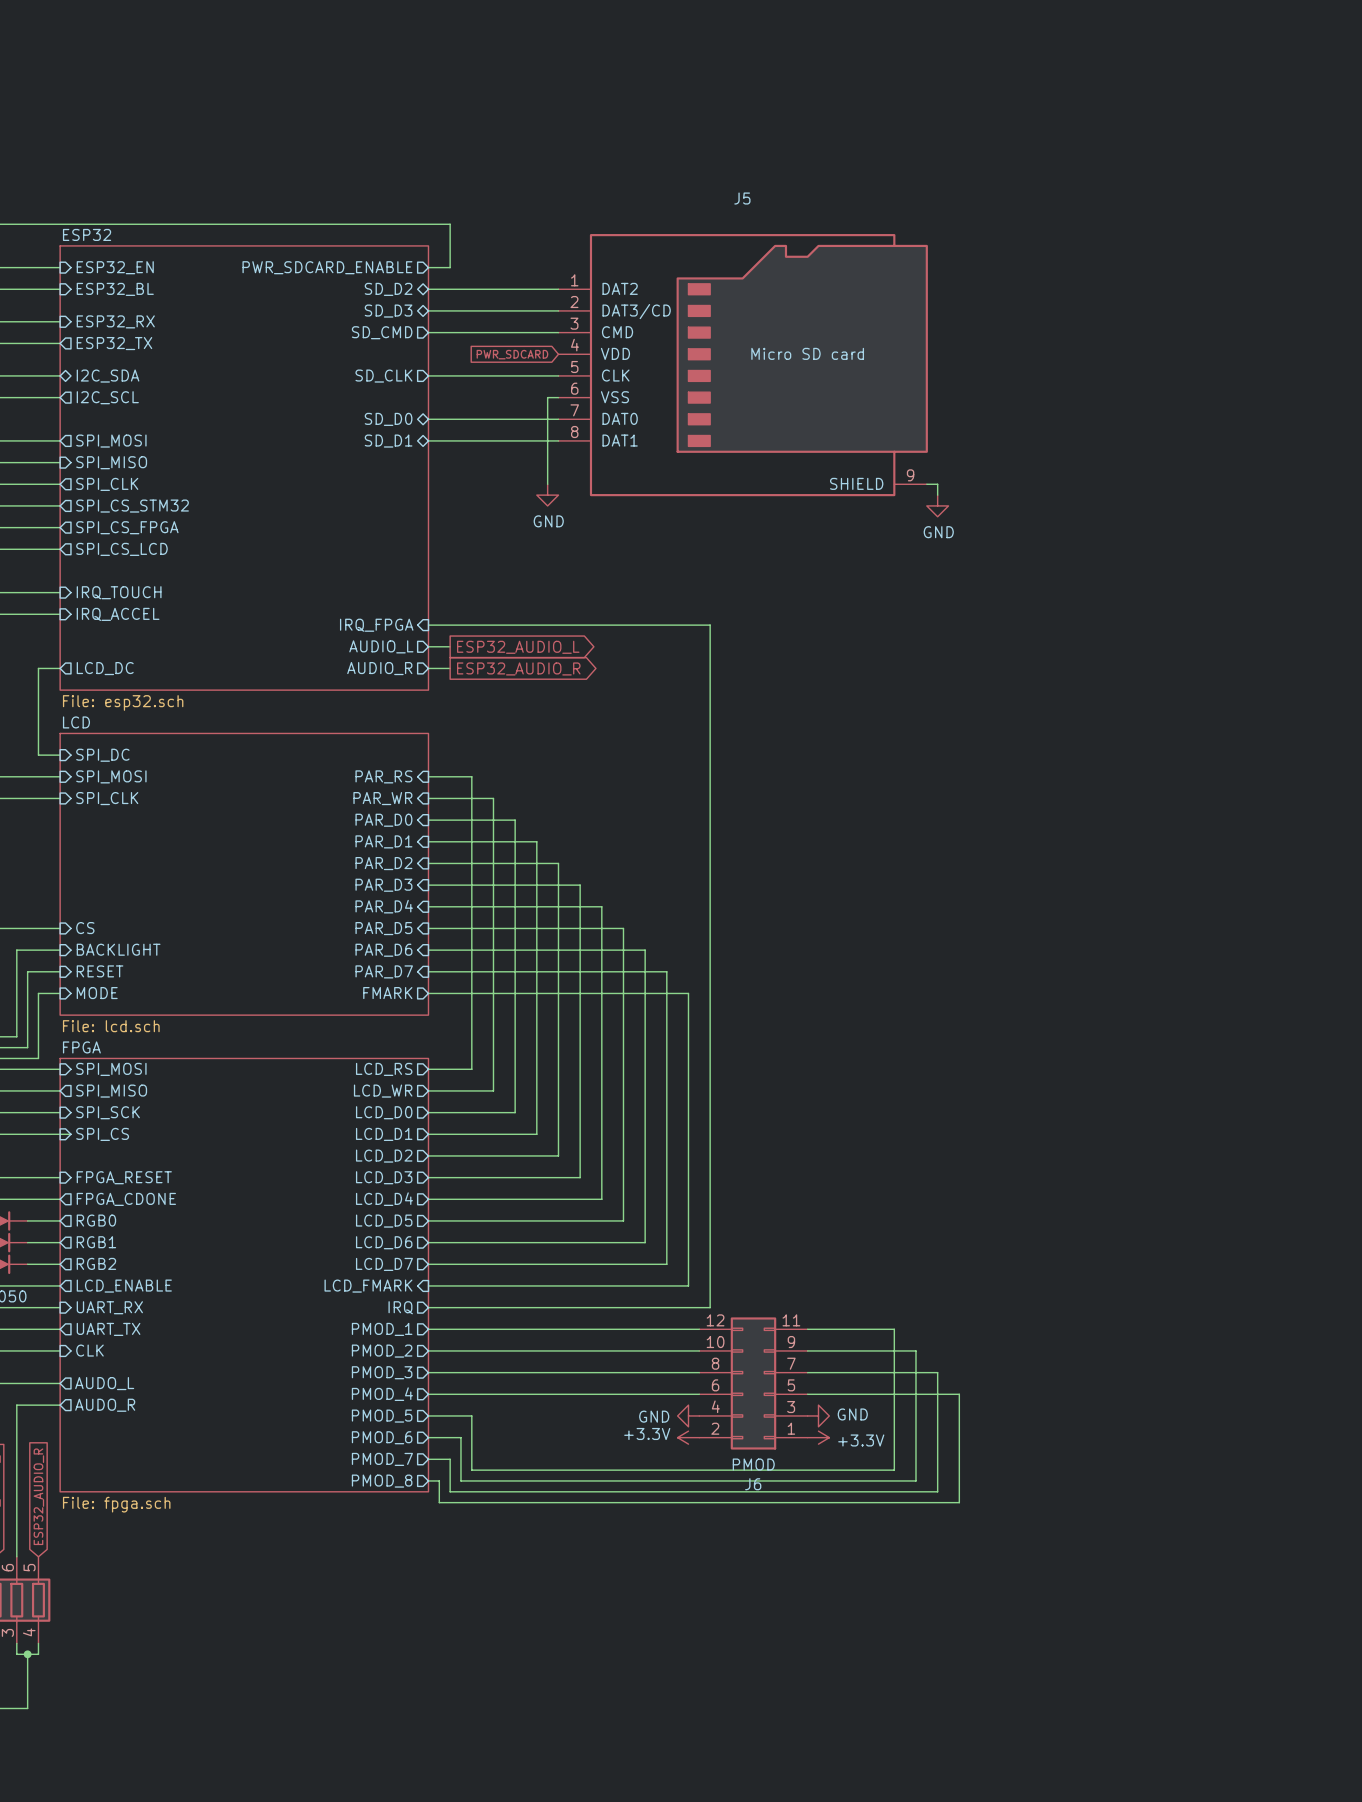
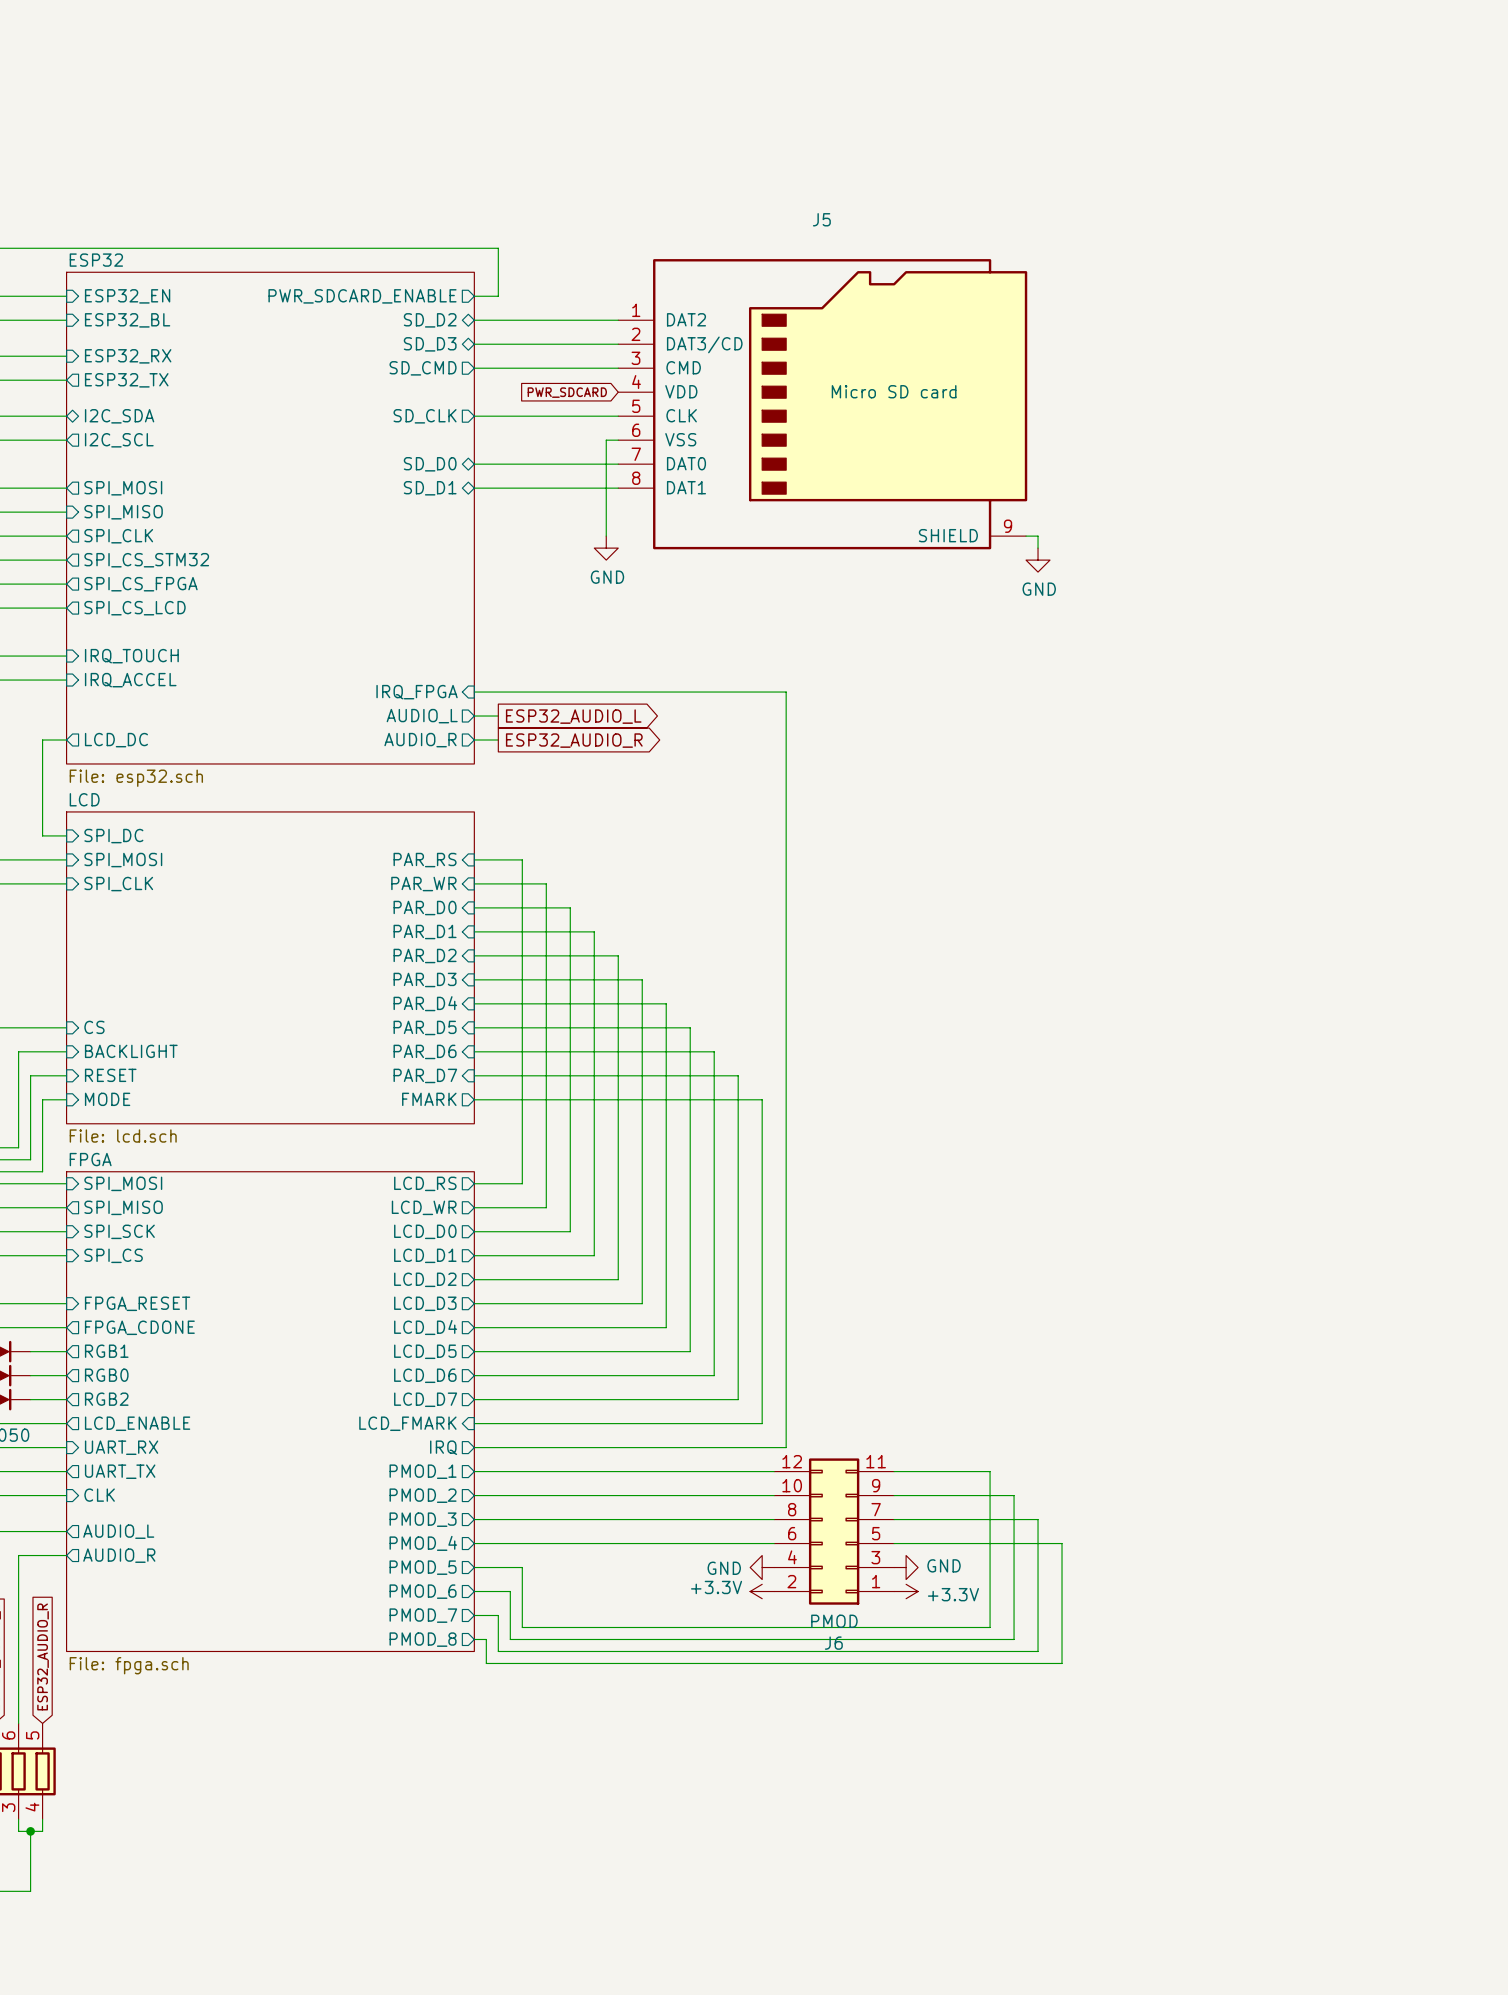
wire: (60, 1134) (70, 1134) -> none
sheet pin: RGB0 (96, 1220) -> RGB1 (106, 1351)
sheet pin: RGB1 (96, 1242) -> RGB0 (106, 1375)
sheet pin: AUDO_L (104, 1383) -> AUDIO_L (118, 1531)
sheet pin: AUDO_R (105, 1405) -> AUDIO_R (119, 1555)

